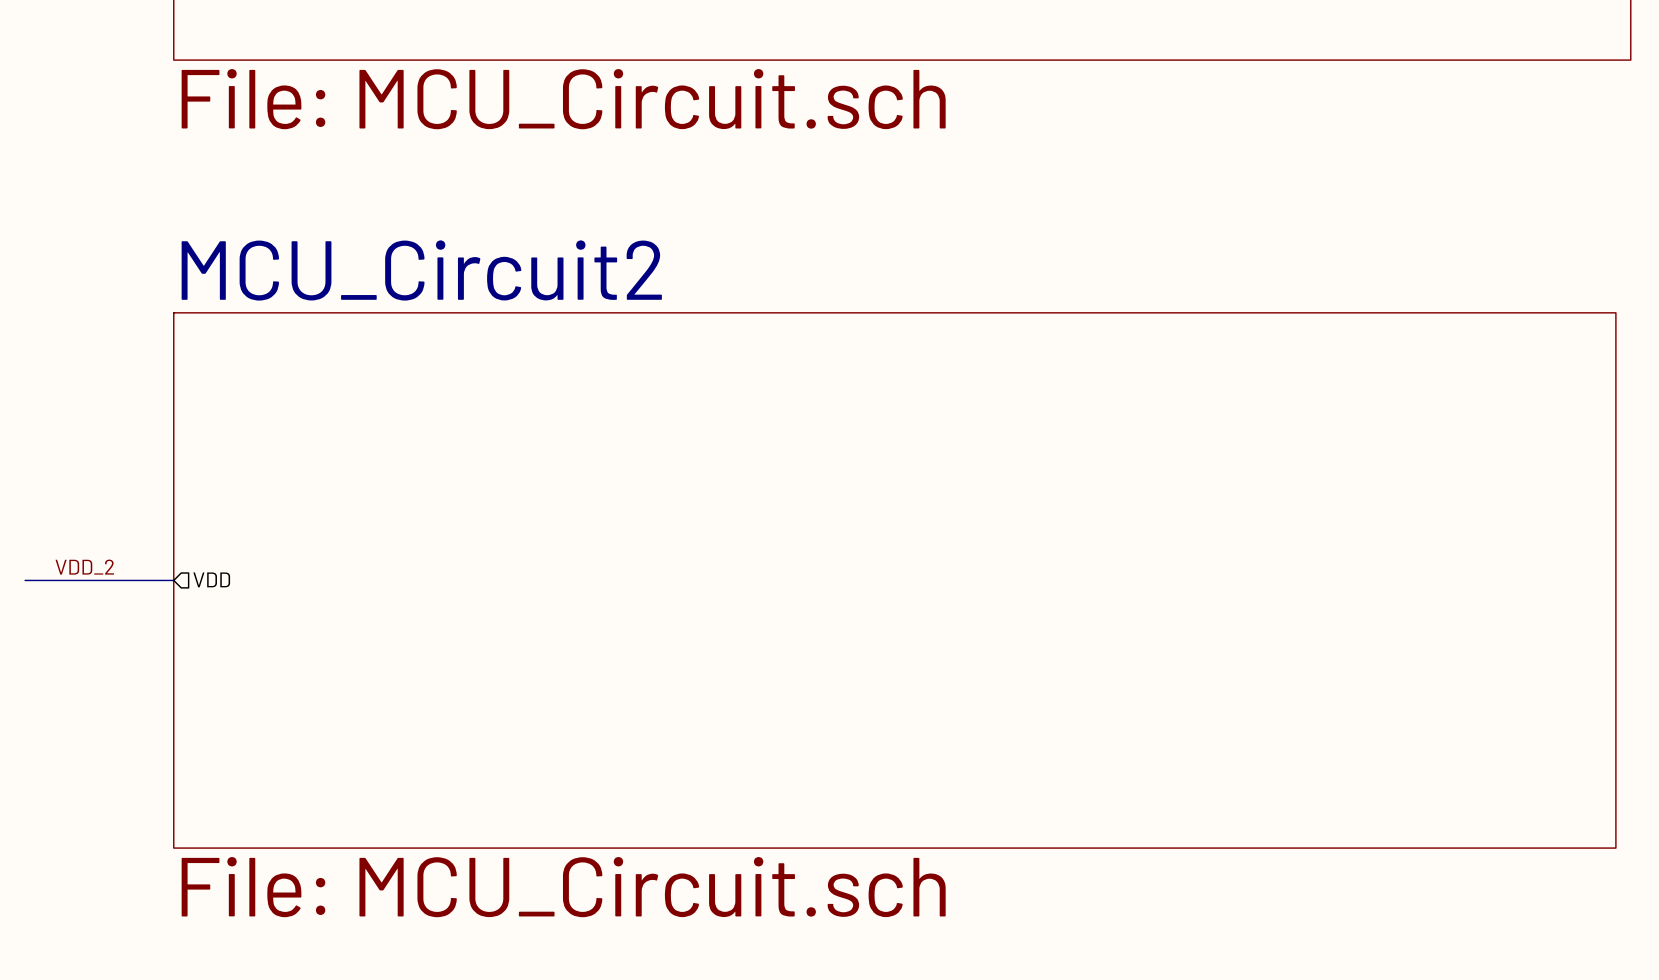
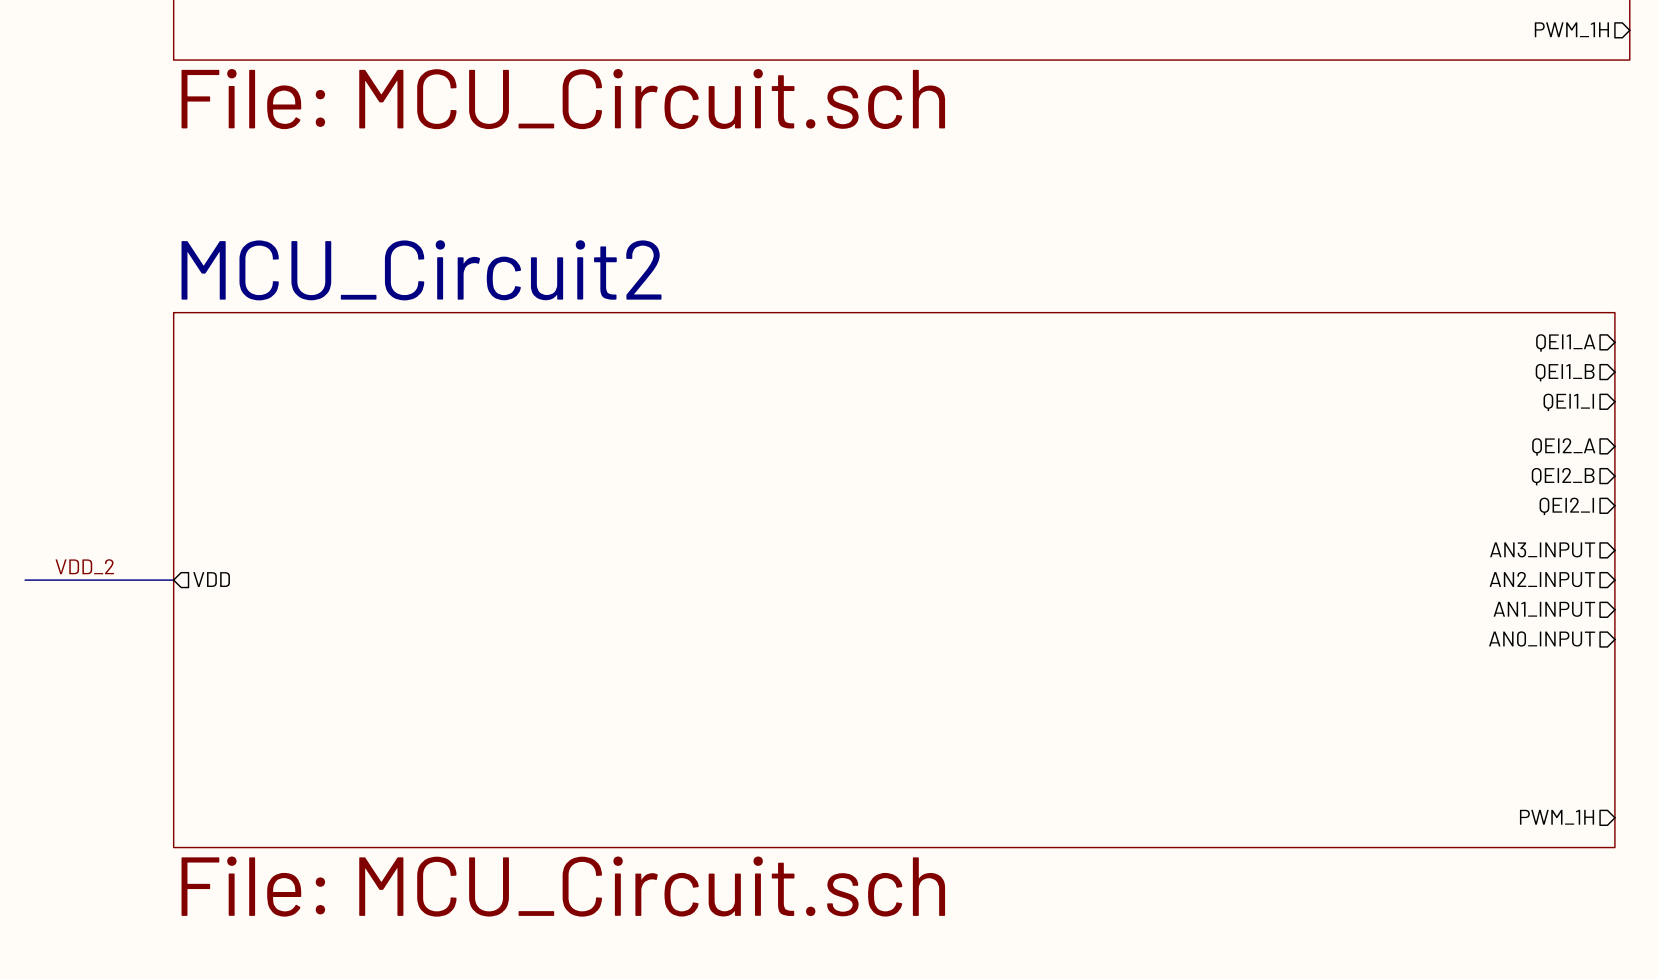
sheet pin: none -> PWM_1H (1571, 29)
sheet pin: none -> QEI1_A (1565, 342)
sheet pin: none -> QEI1_B (1565, 372)
sheet pin: none -> QEI1_I (1568, 402)
sheet pin: none -> QEI2_A (1563, 446)
sheet pin: none -> QEI2_B (1563, 476)
sheet pin: none -> QEI2_I (1566, 506)
sheet pin: none -> AN3_INPUT (1542, 549)
sheet pin: none -> AN2_INPUT (1542, 579)
sheet pin: none -> AN1_INPUT (1544, 609)
sheet pin: none -> AN0_INPUT (1542, 638)
sheet pin: none -> PWM_1H (1557, 817)

